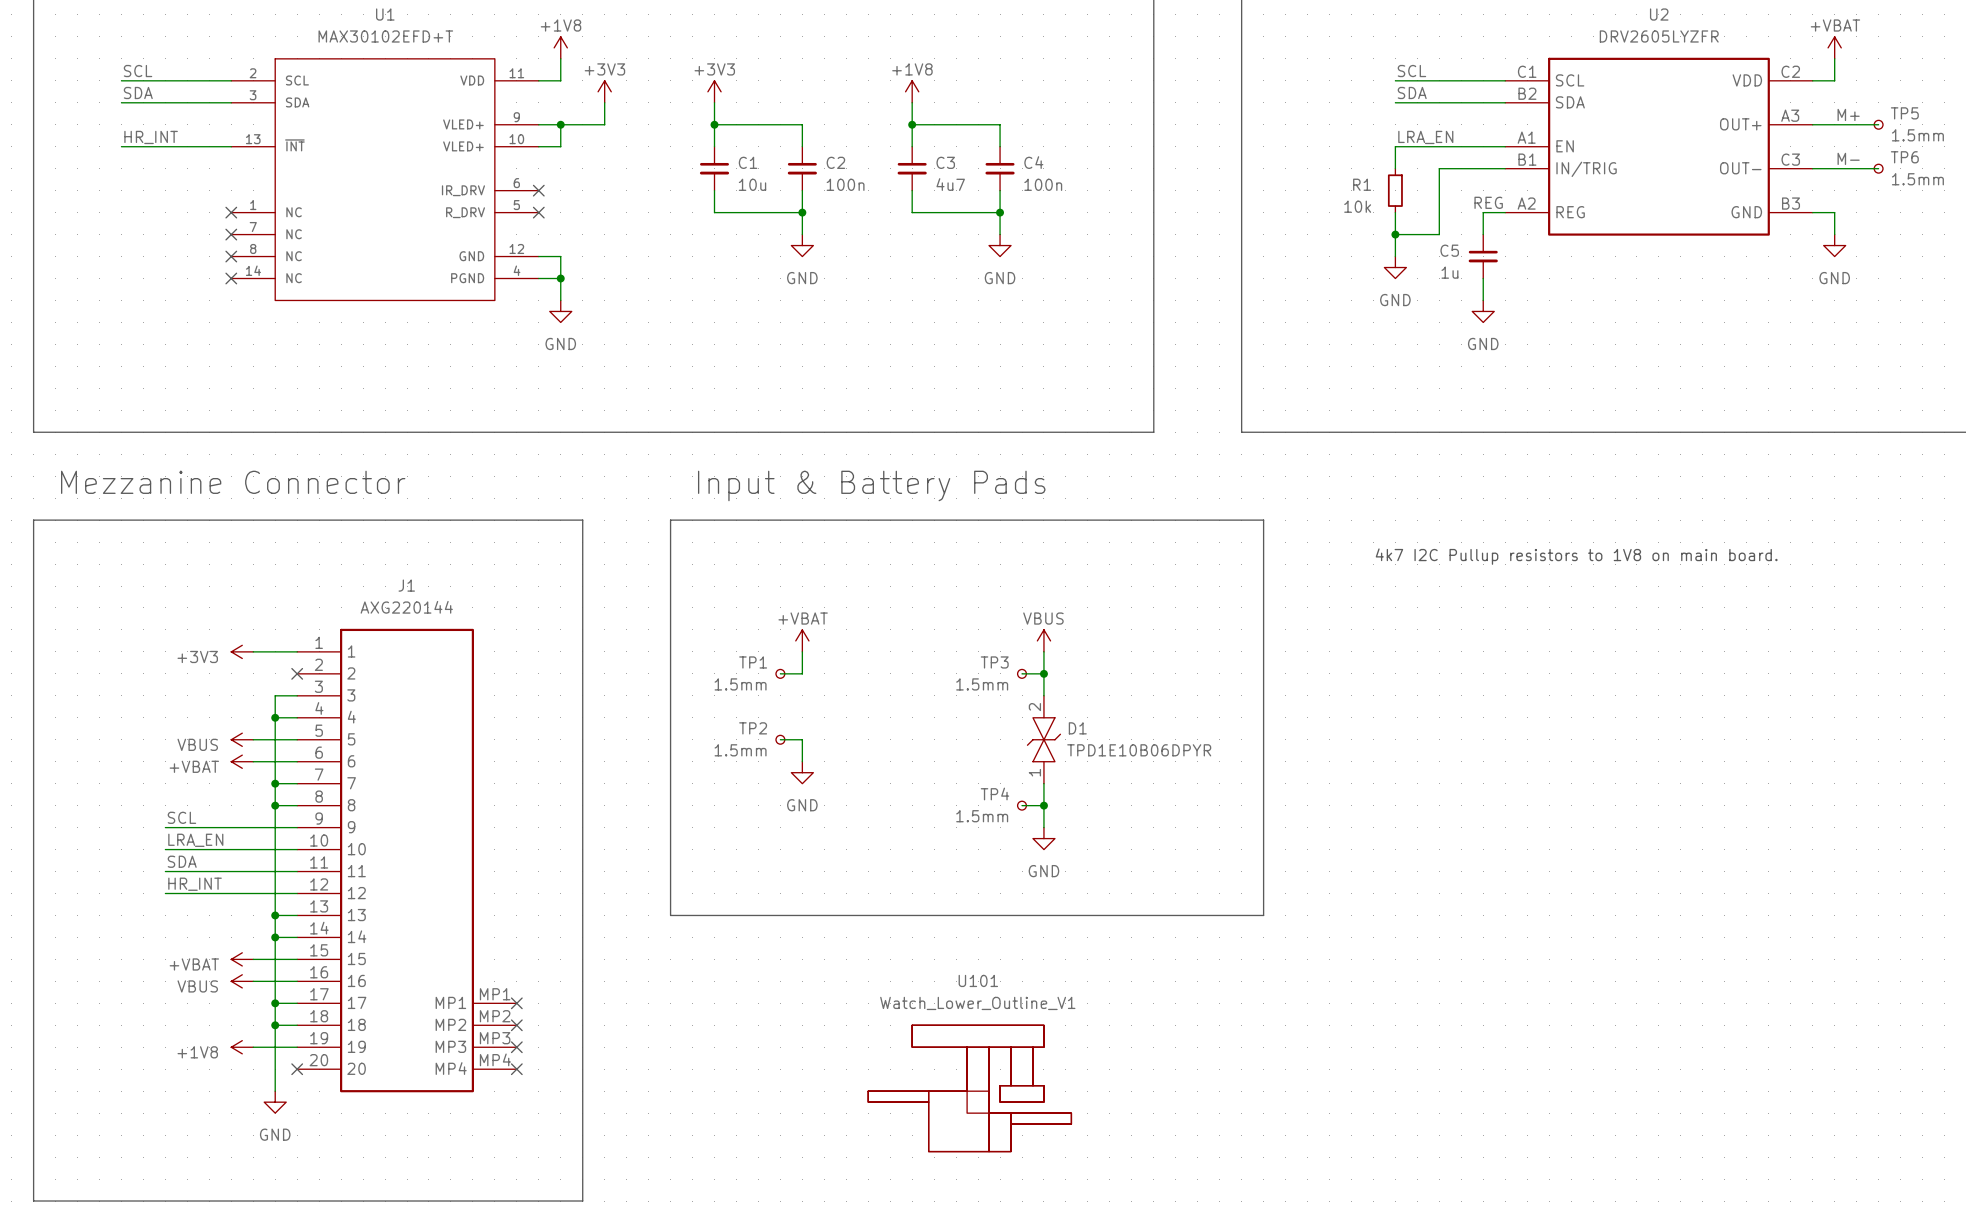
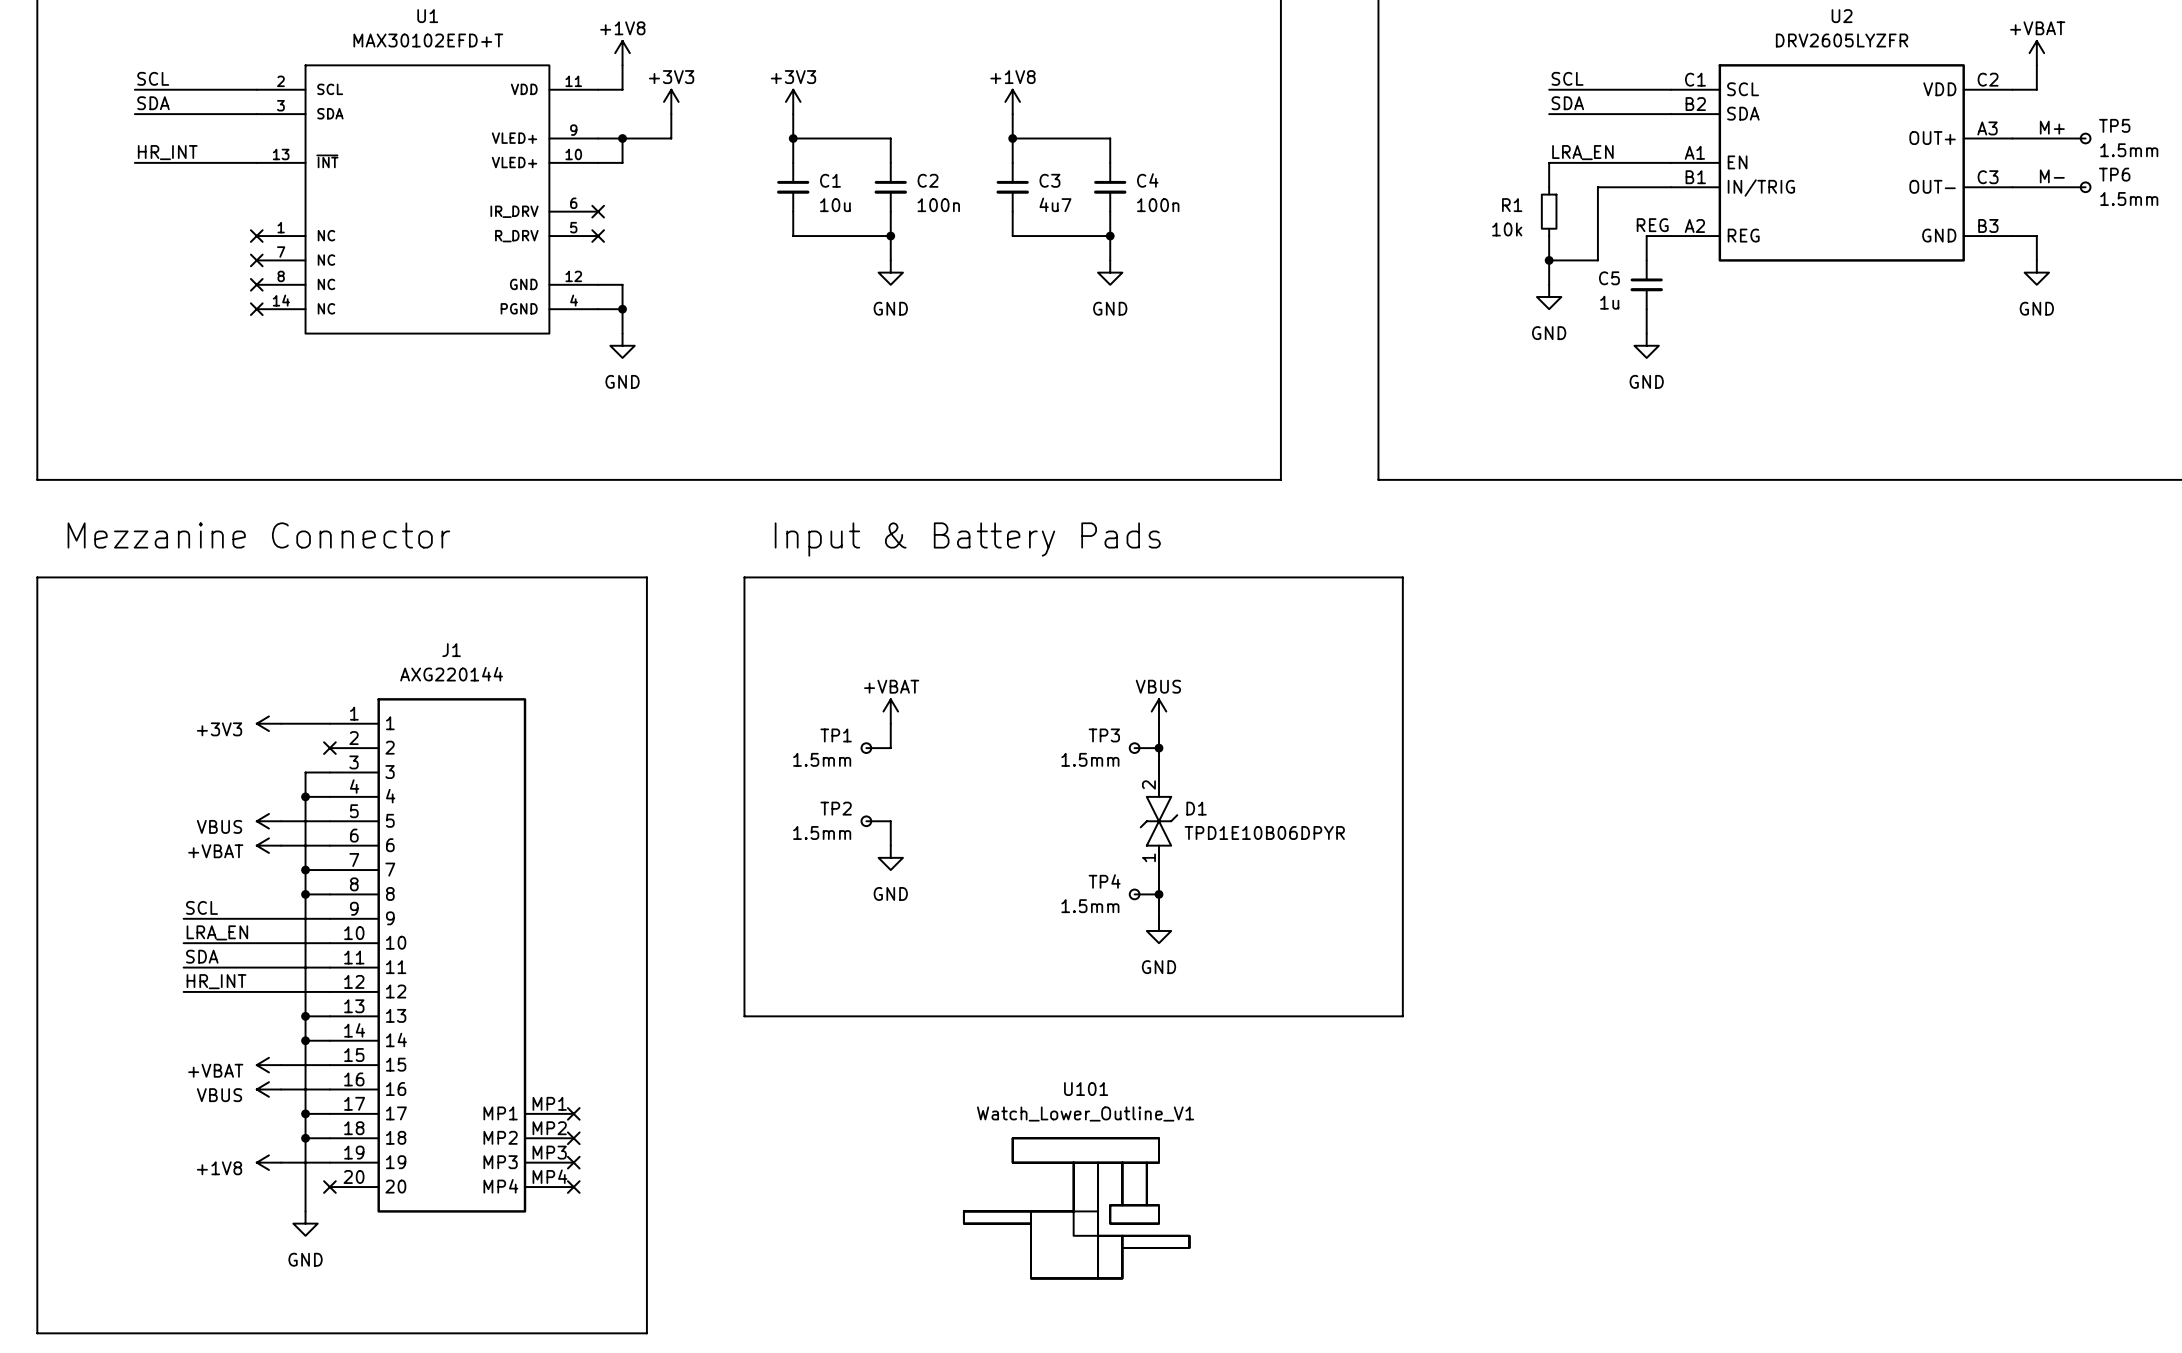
text: 4k7 I2C Pullup resistors to 1V8 on main board. (1576, 556) -> none

